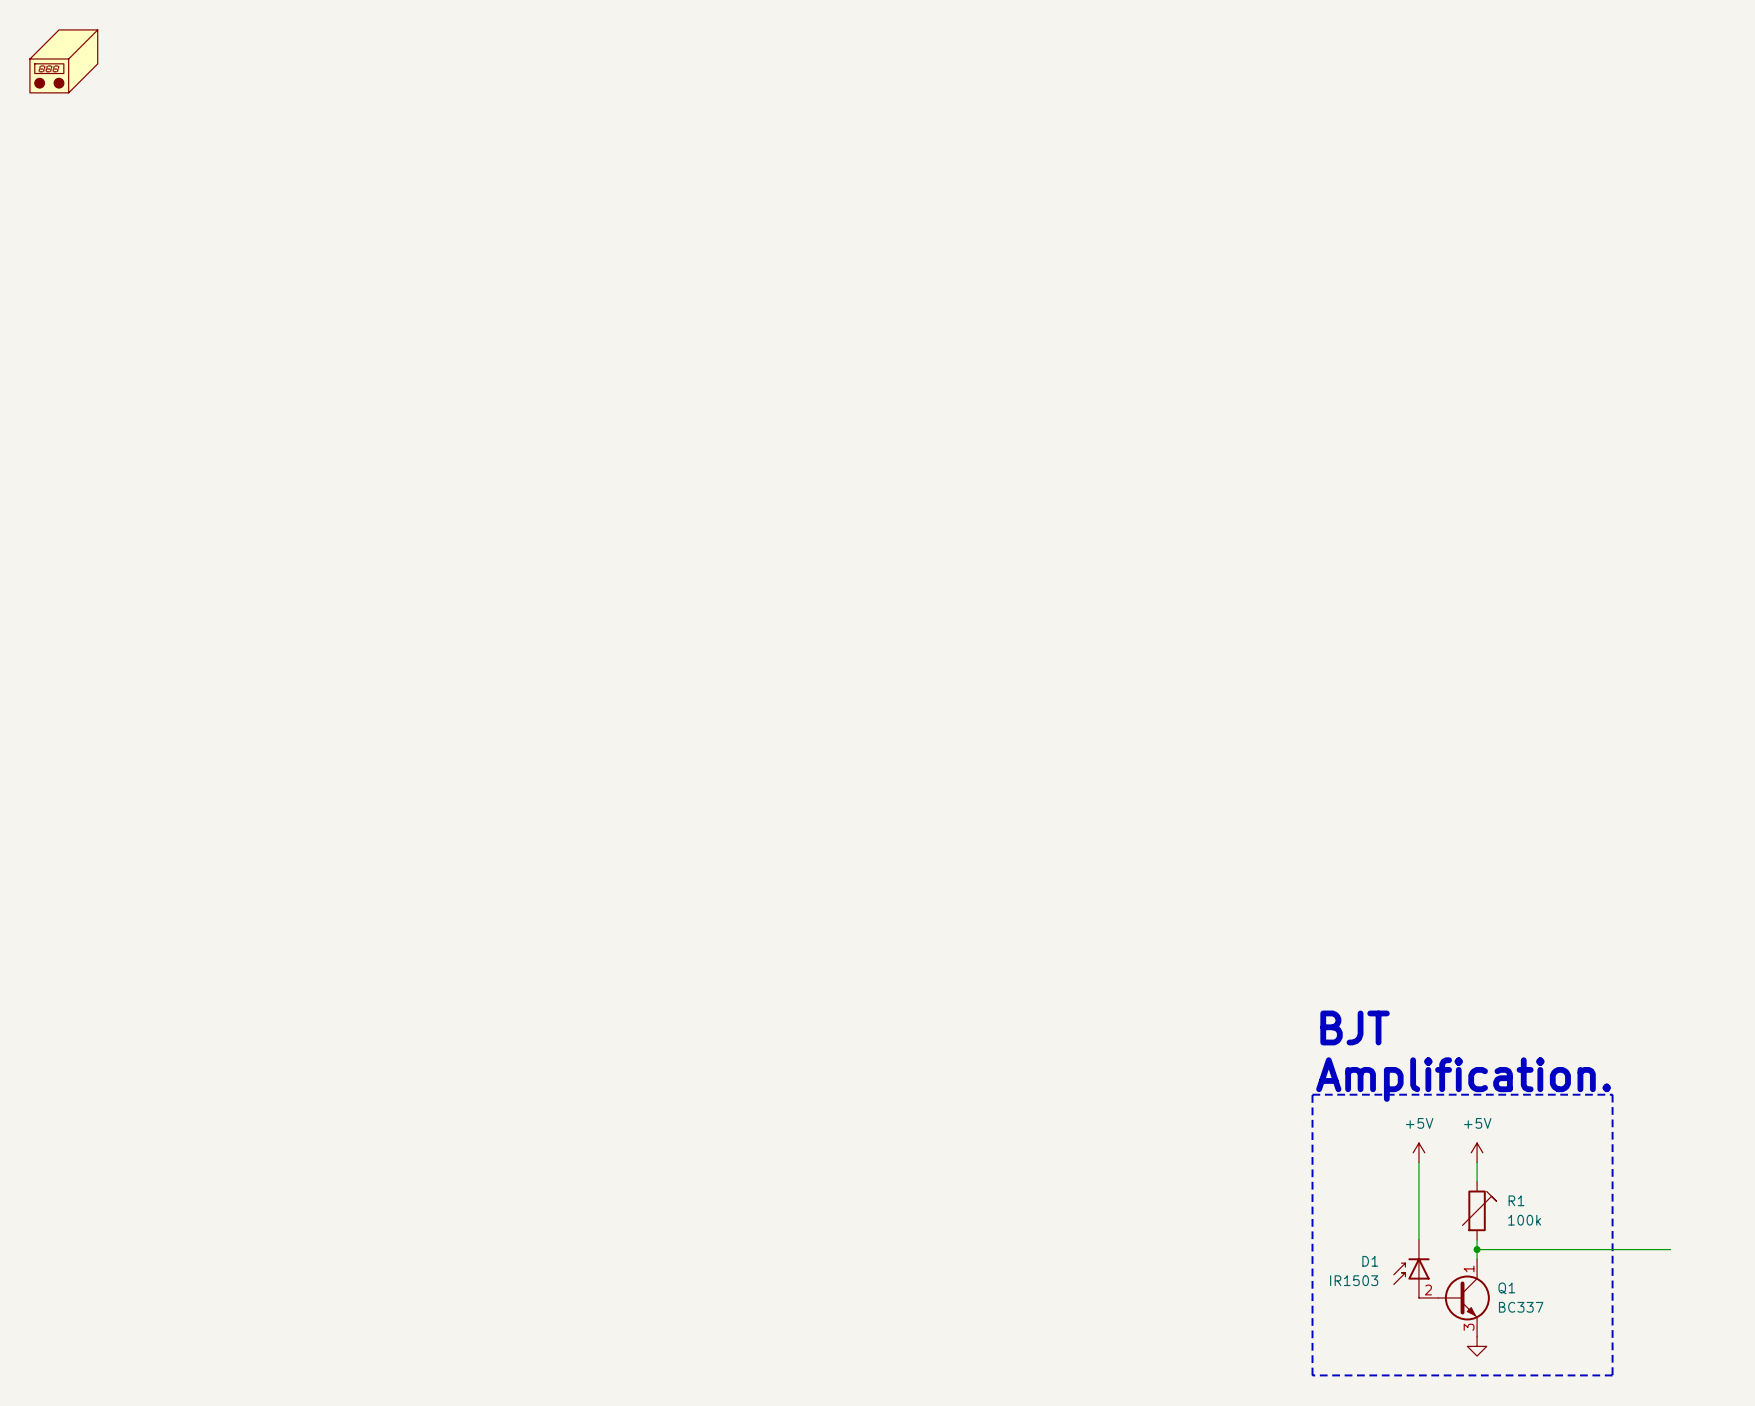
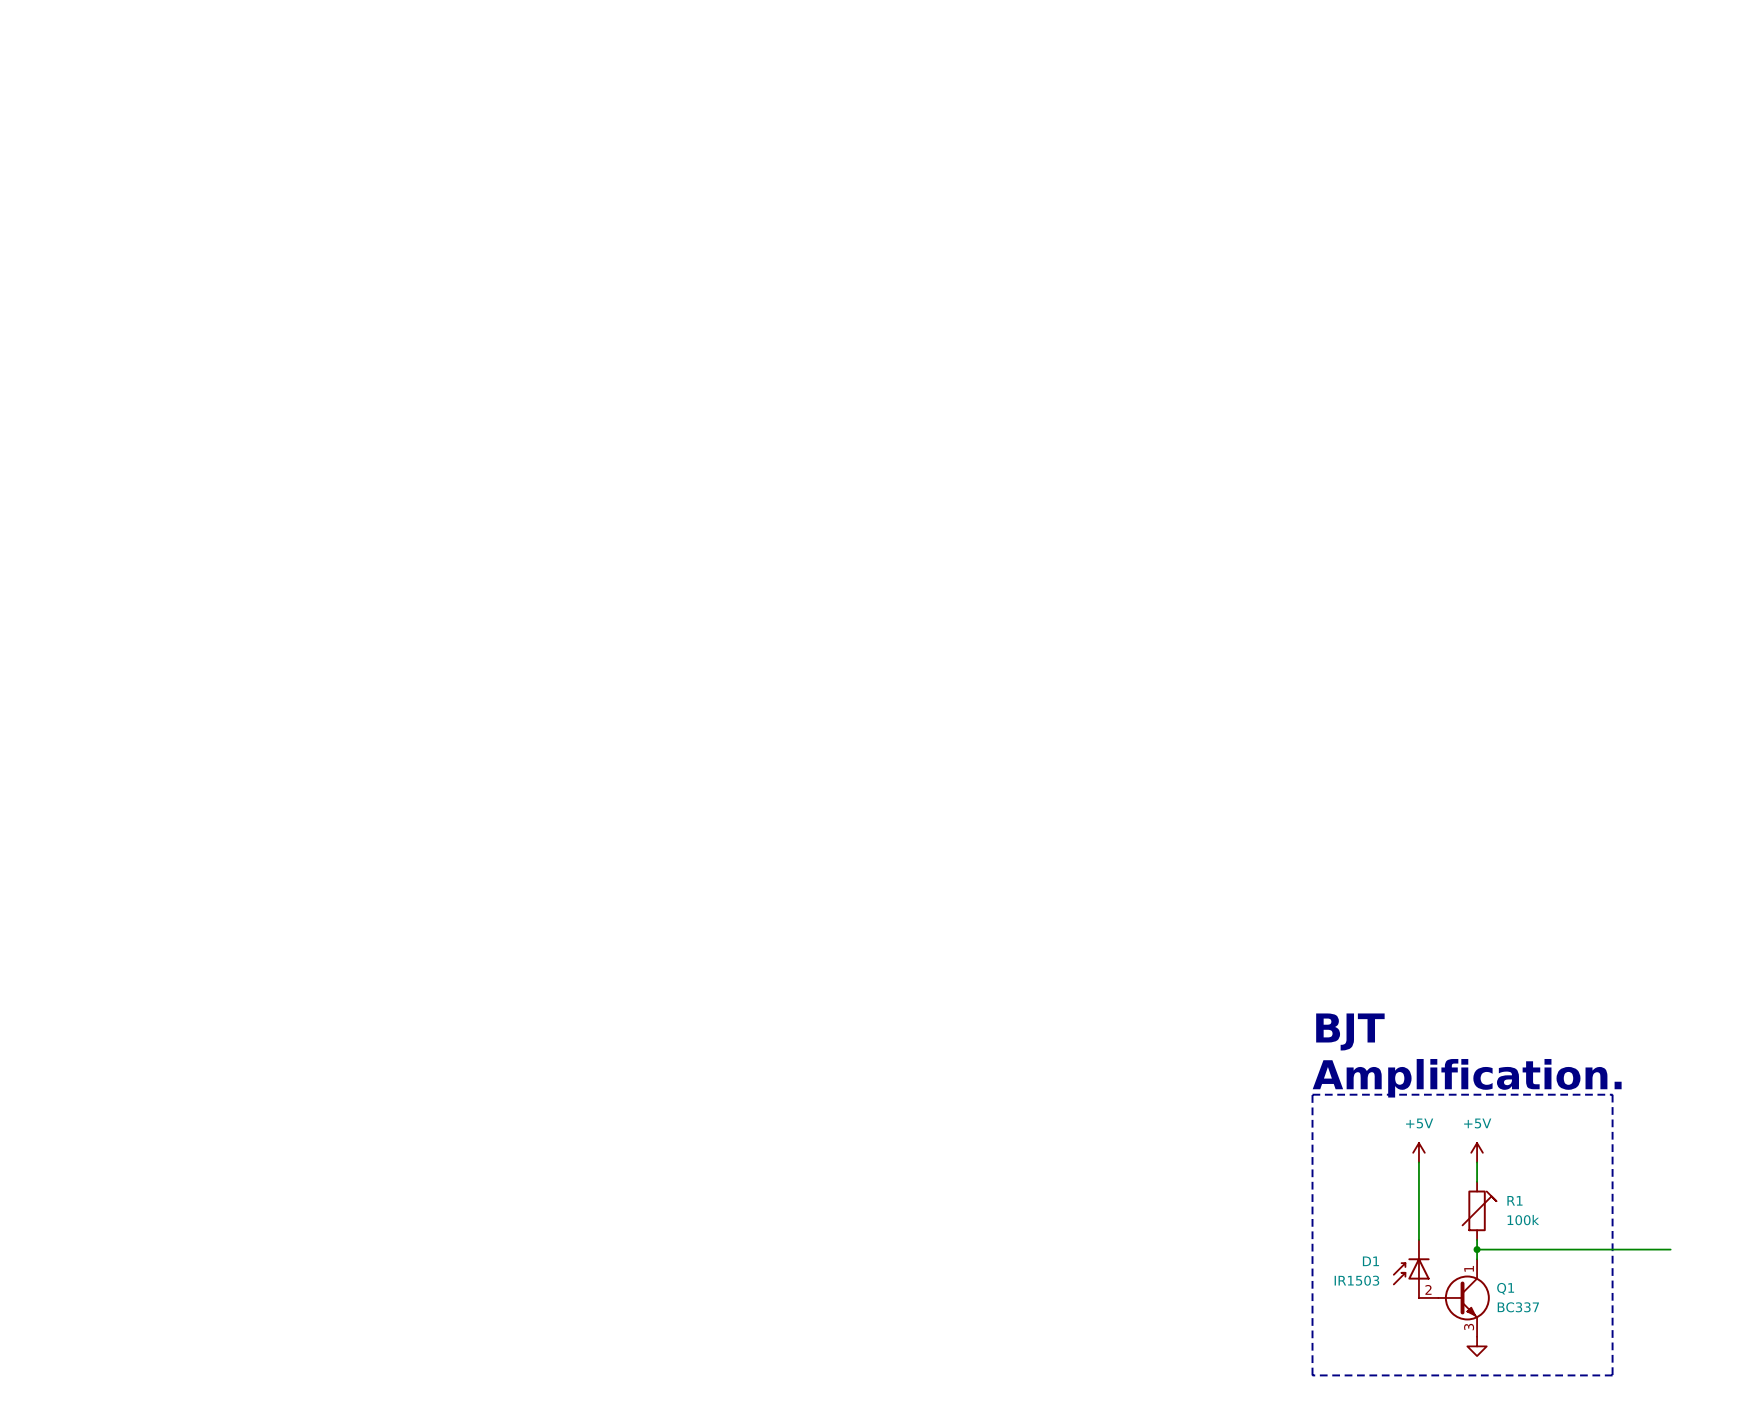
part: (63, 61) -> none

